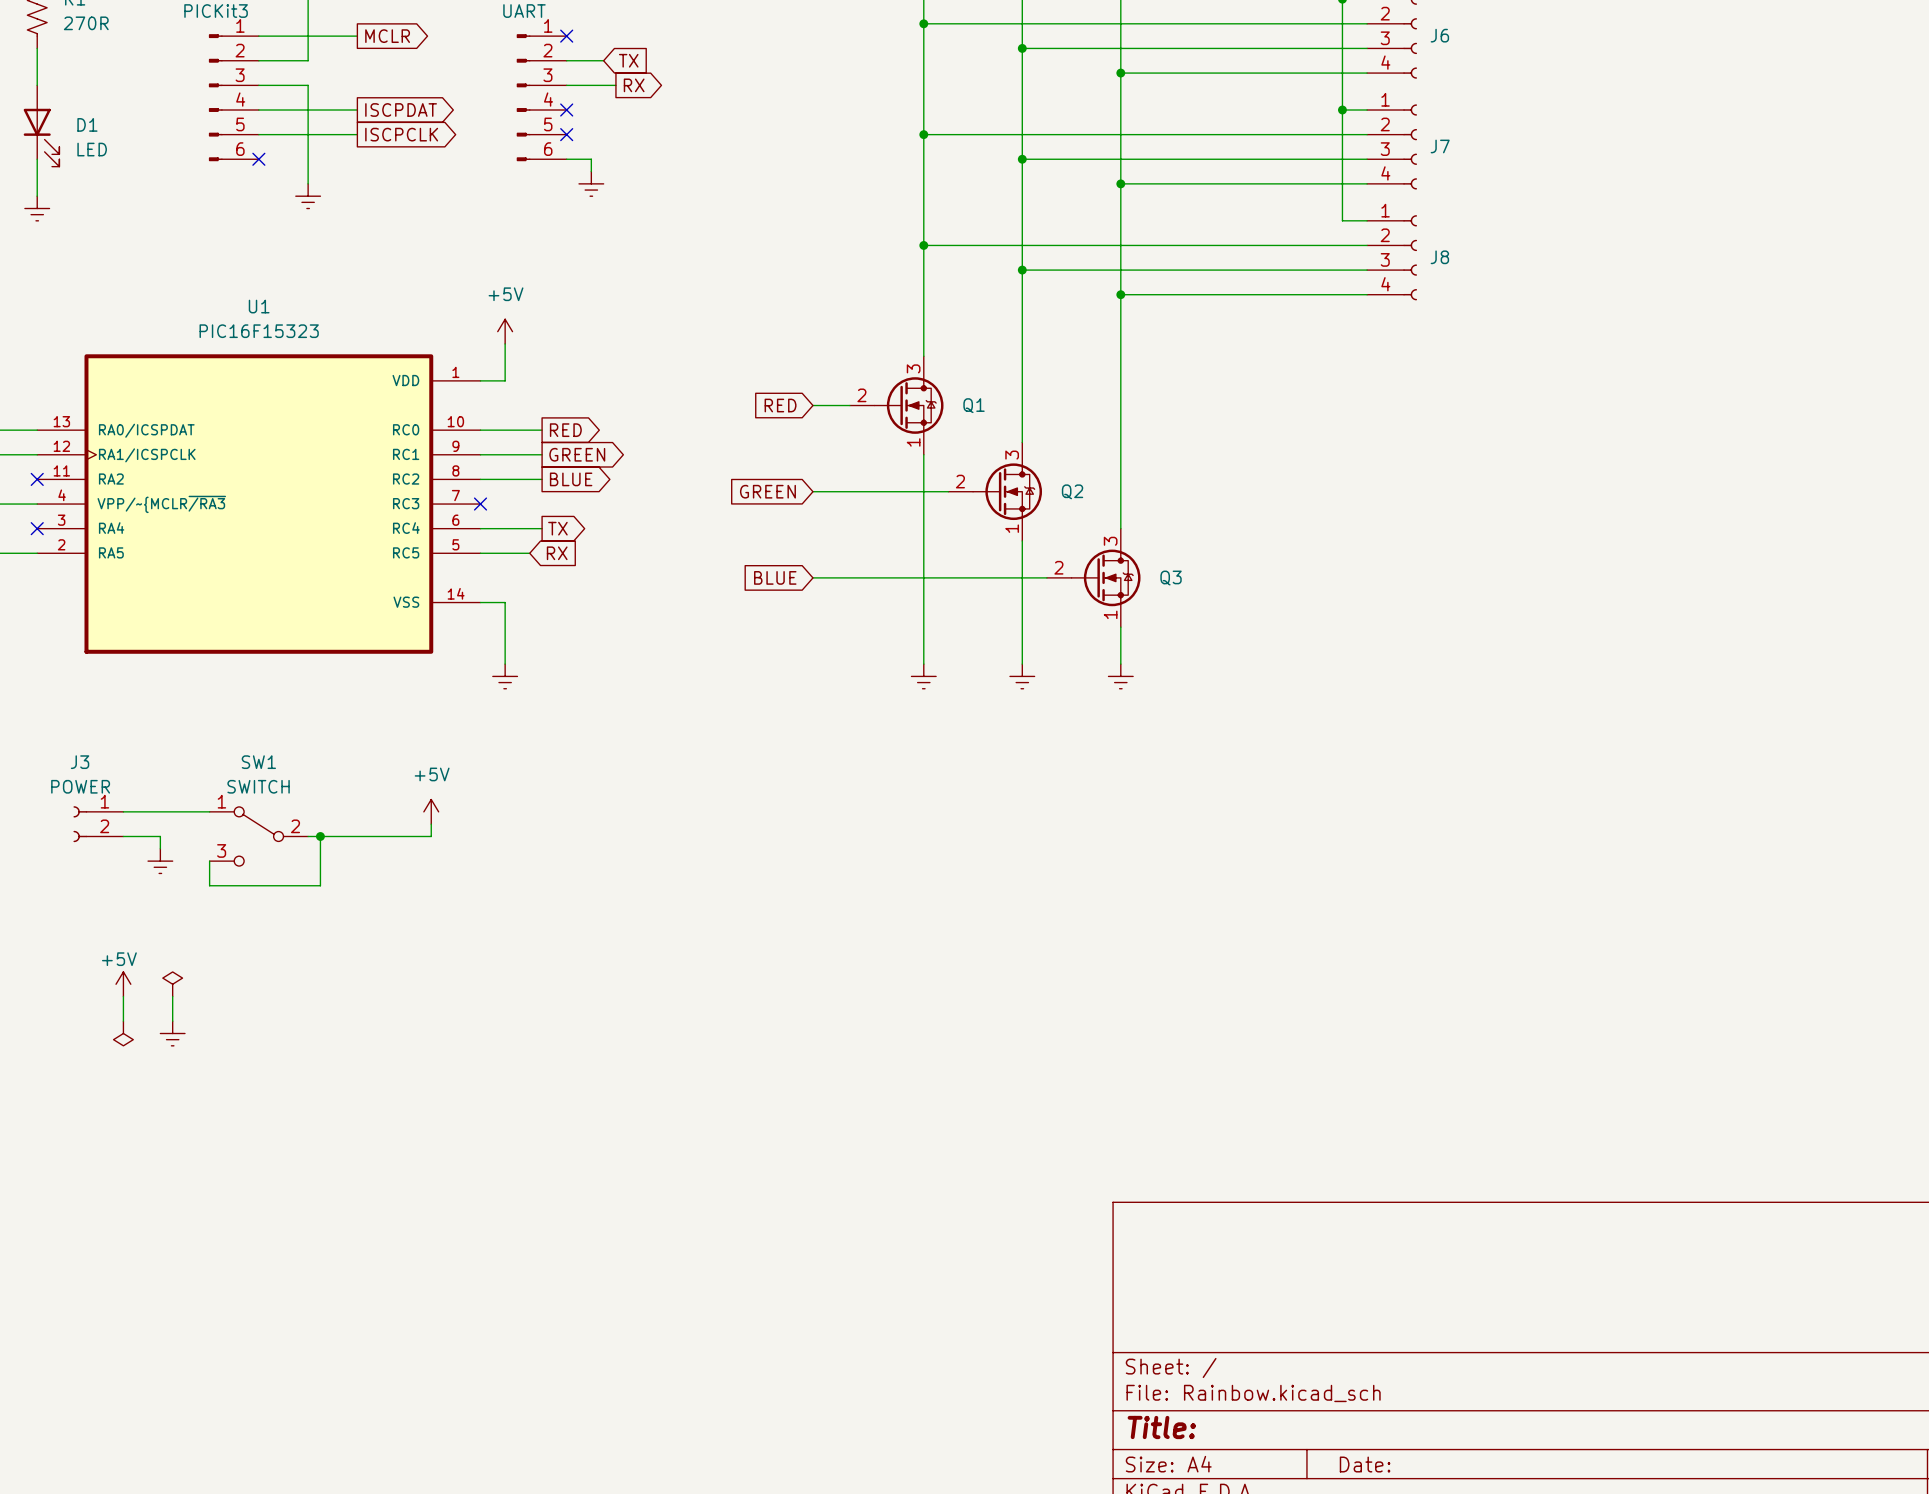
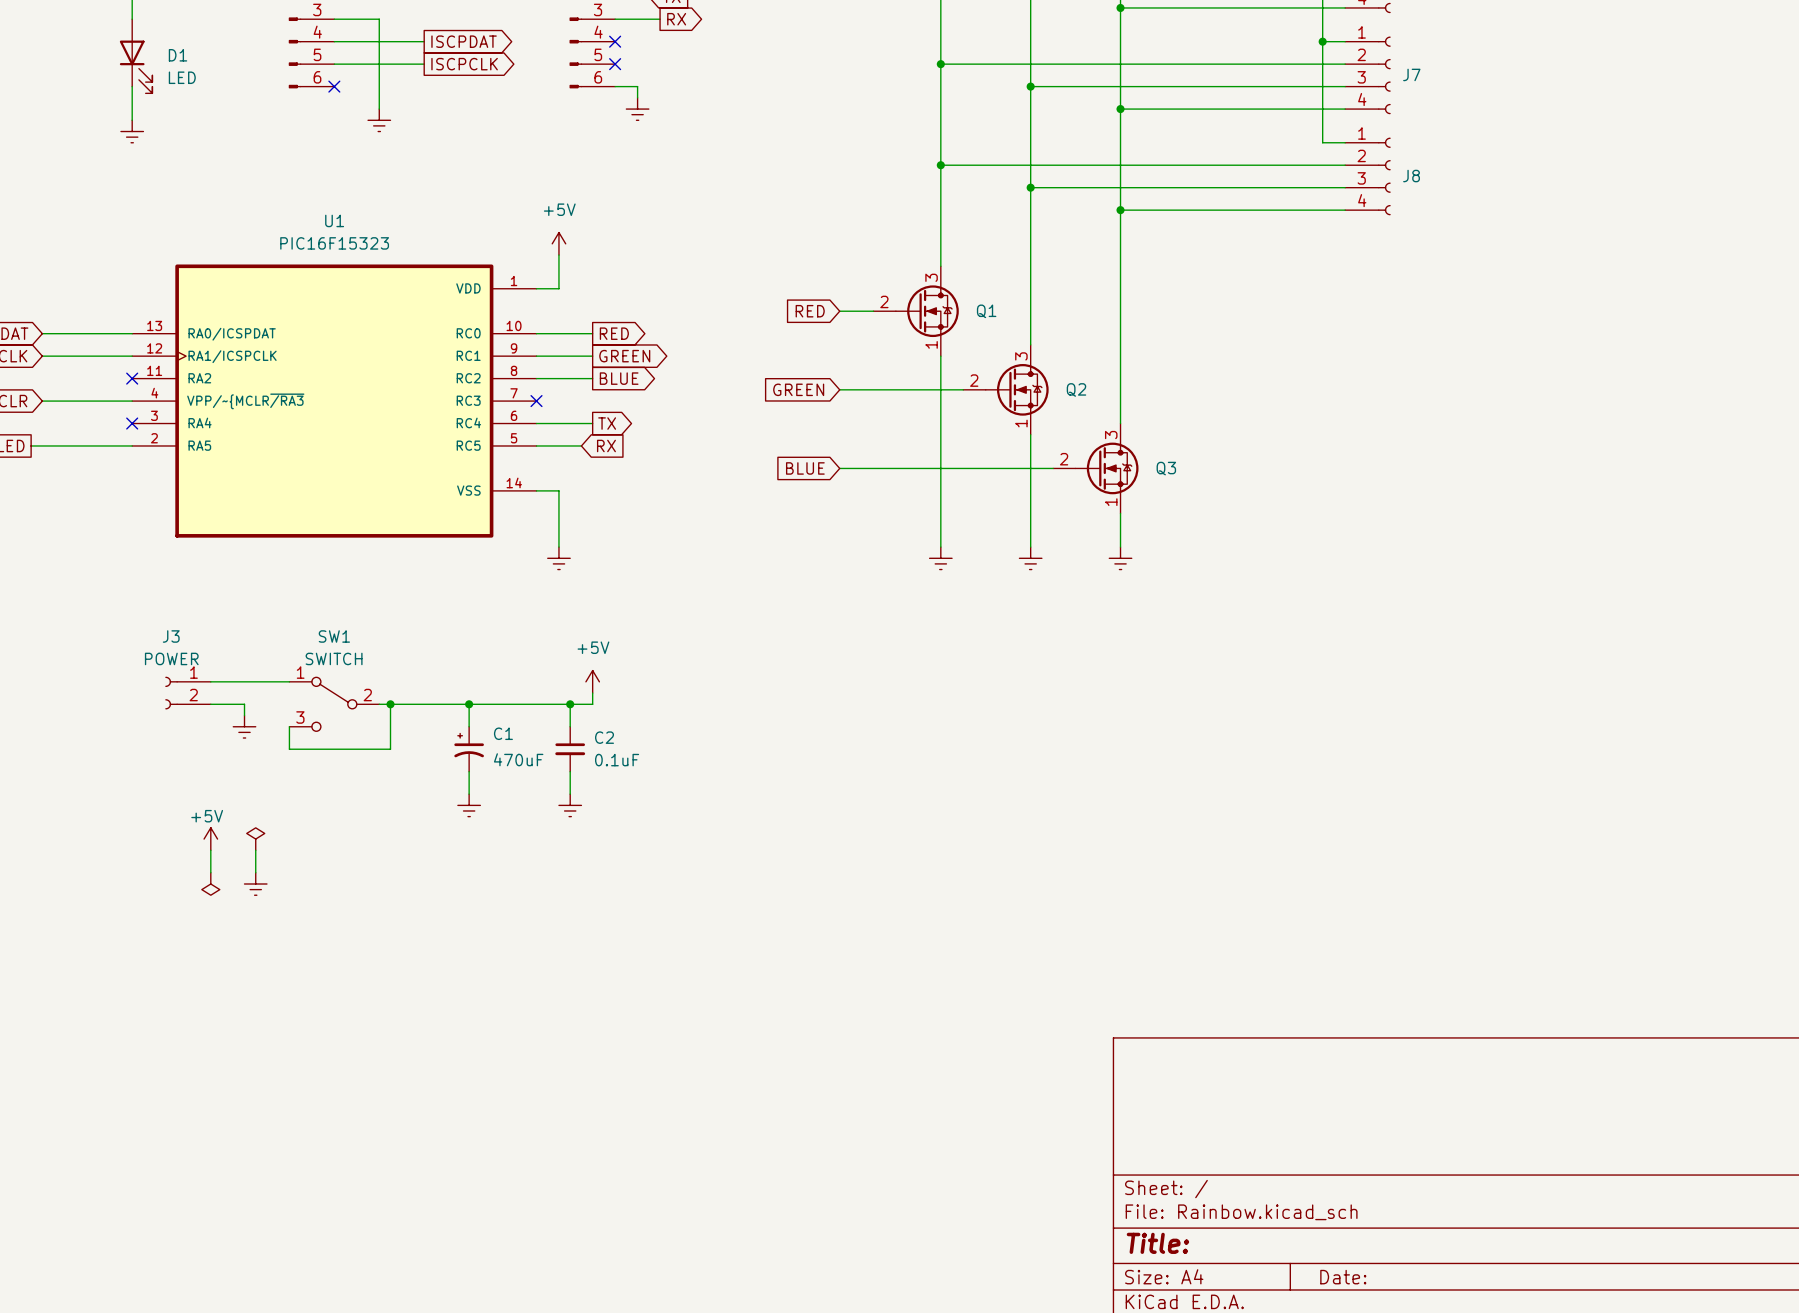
power symbol position: +5V (431, 811) -> +5V (592, 681)
wire: (431, 824) (431, 836) -> (592, 693) (592, 704) (491, 704)
wire: none -> (469, 704) (469, 726)
junction: none -> (469, 704)
wire: none -> (570, 704) (570, 726)
junction: none -> (570, 704)
C1: none -> 470uF (469, 749)
C2: none -> 0.1uF (570, 749)
wire: none -> (469, 771) (469, 794)
wire: none -> (570, 771) (570, 794)
power symbol: none -> (469, 805)
power symbol: none -> (570, 805)

